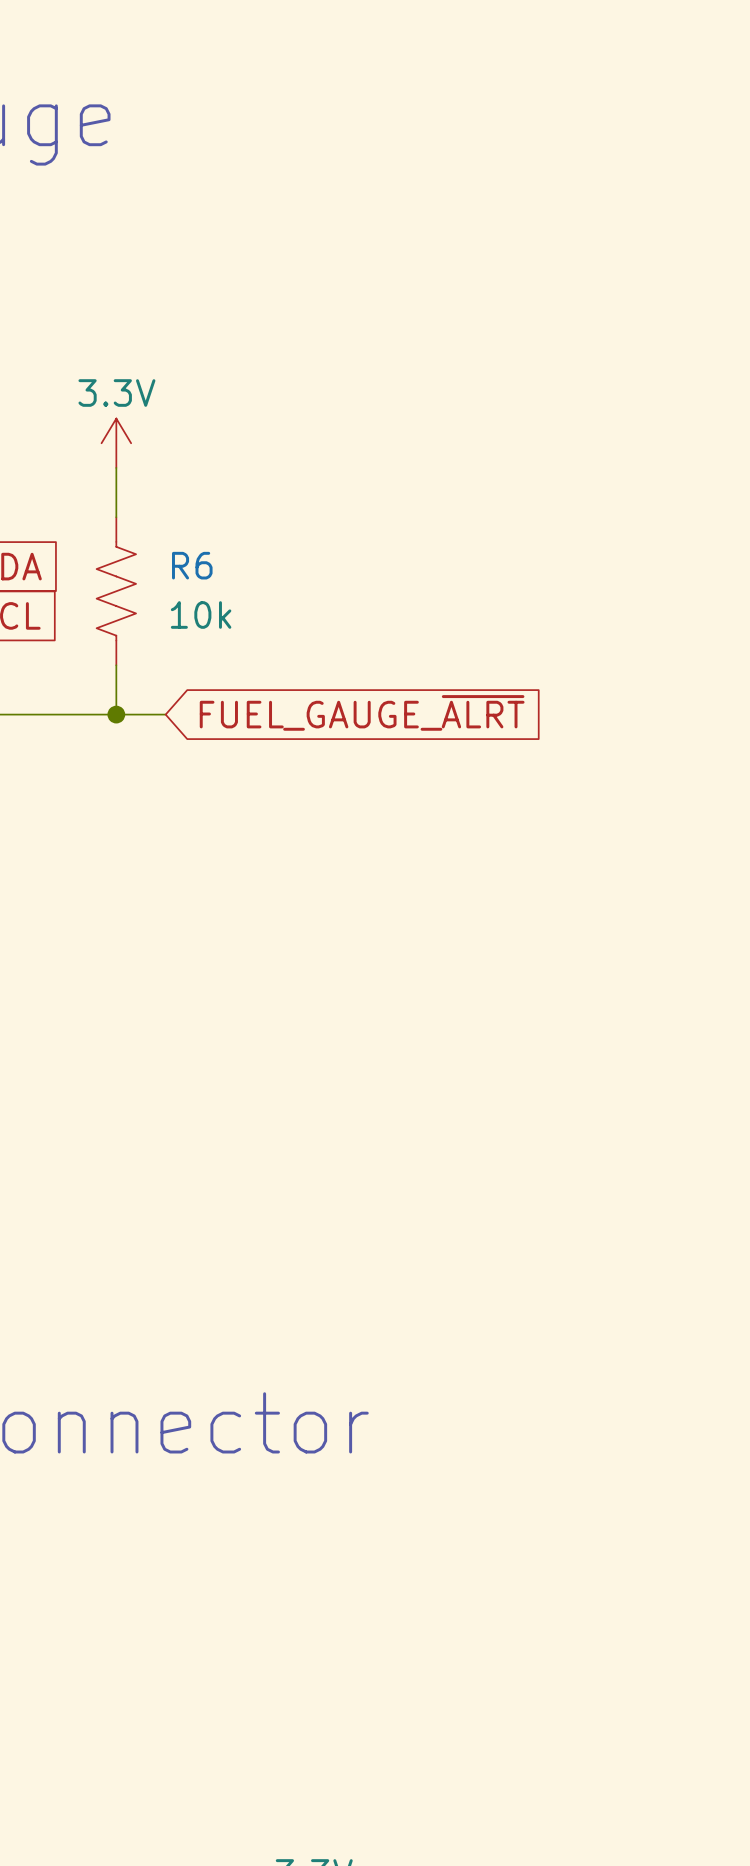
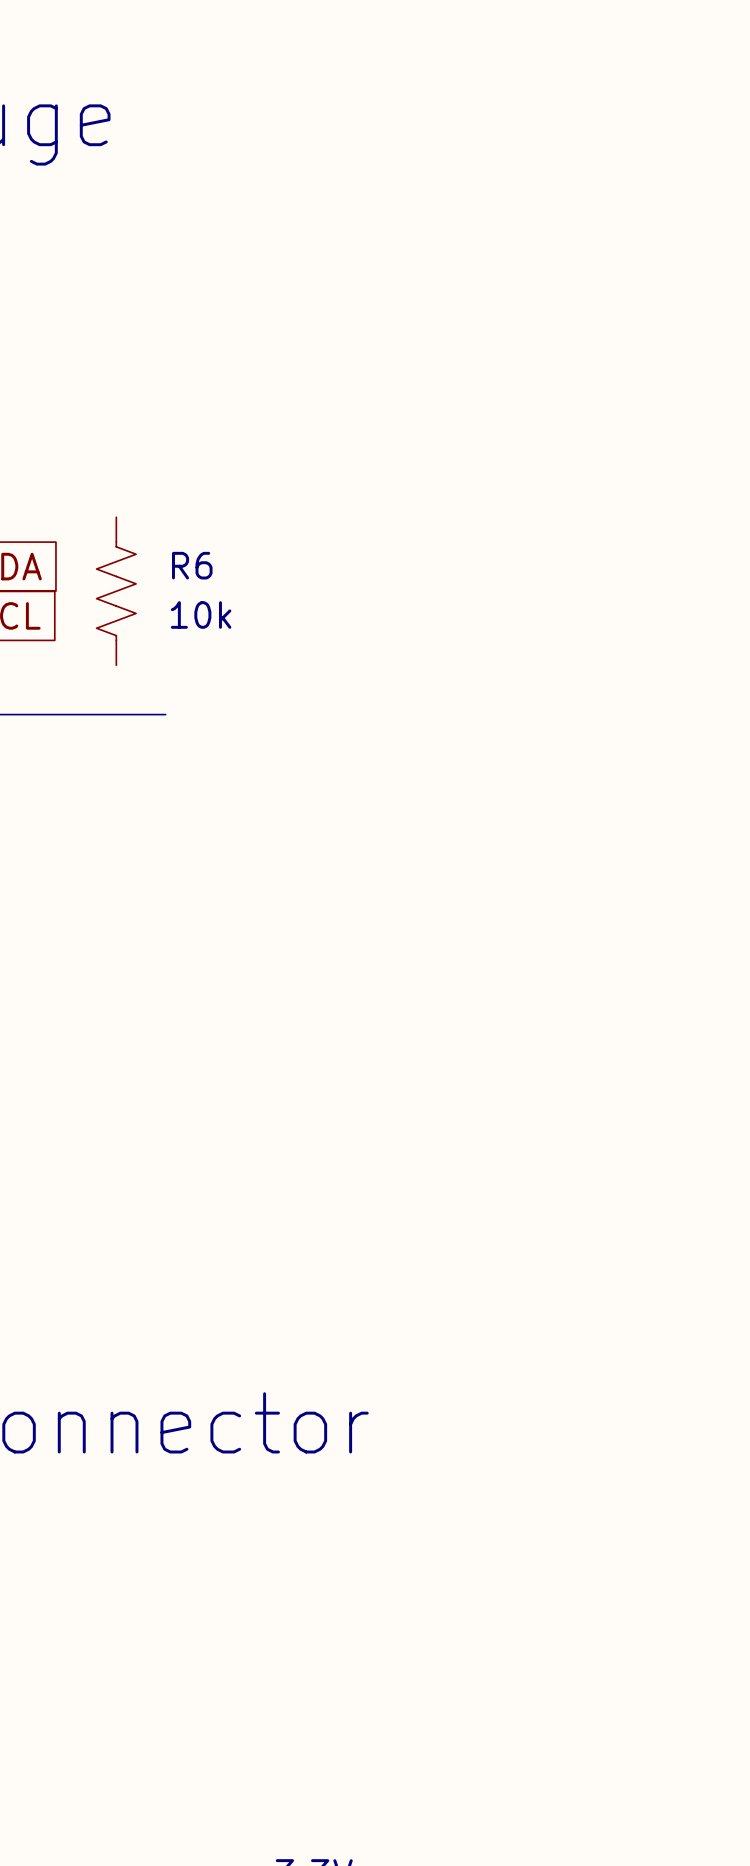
power symbol: 3.3V (116, 443) -> none
wire: (116, 467) (116, 517) -> none
wire: (116, 665) (116, 714) -> none
global label: FUEL_GAUGE_~{ALRT} (362, 712) -> none
junction: (116, 714) -> none

